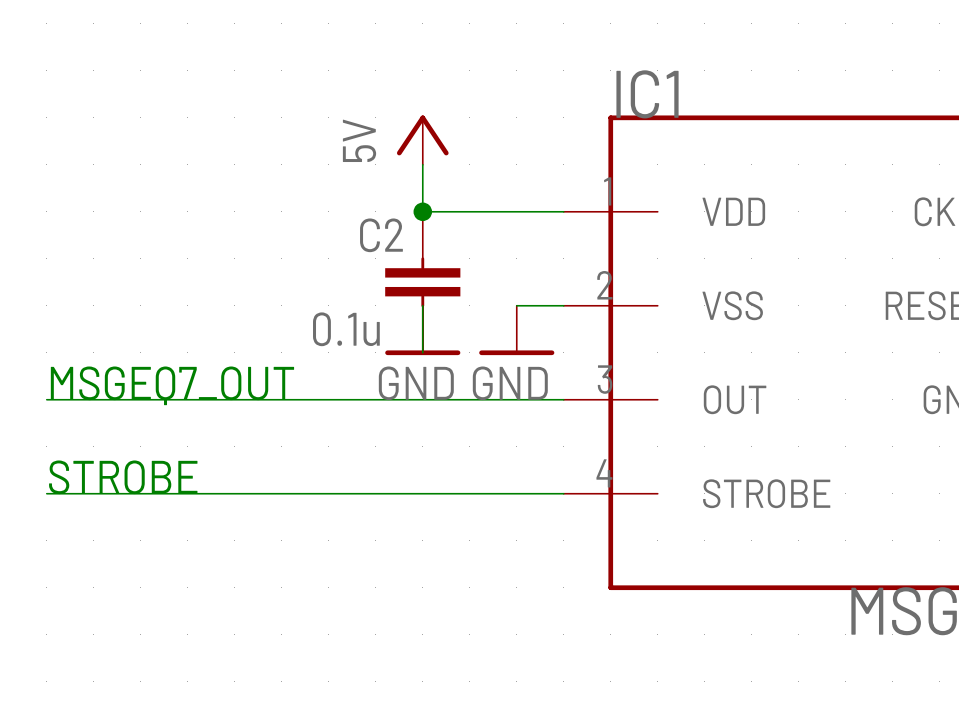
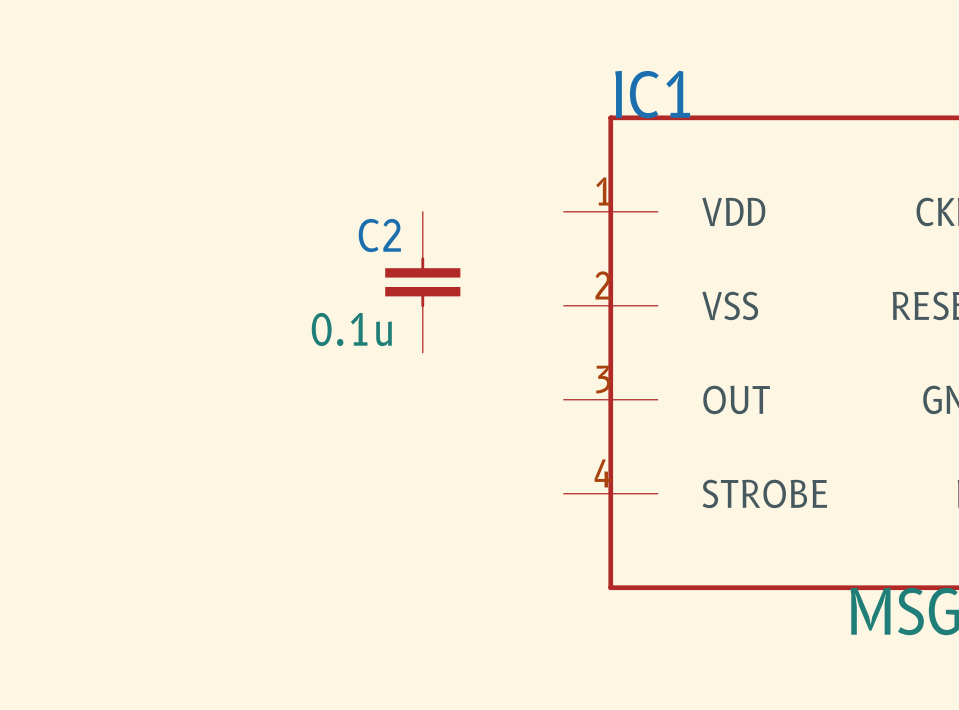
power symbol: 5V (422, 140) -> none
wire: (422, 164) (422, 211) (563, 211) -> none
junction: (422, 211) -> none
wire: (516, 305) (563, 305) -> none
power symbol: GND (422, 330) -> none
power symbol: GND (516, 330) -> none
text: MSGEQ7_OUT (172, 385) -> none
wire: (46, 399) (563, 399) -> none
text: STROBE (123, 477) -> none
wire: (46, 493) (563, 493) -> none

